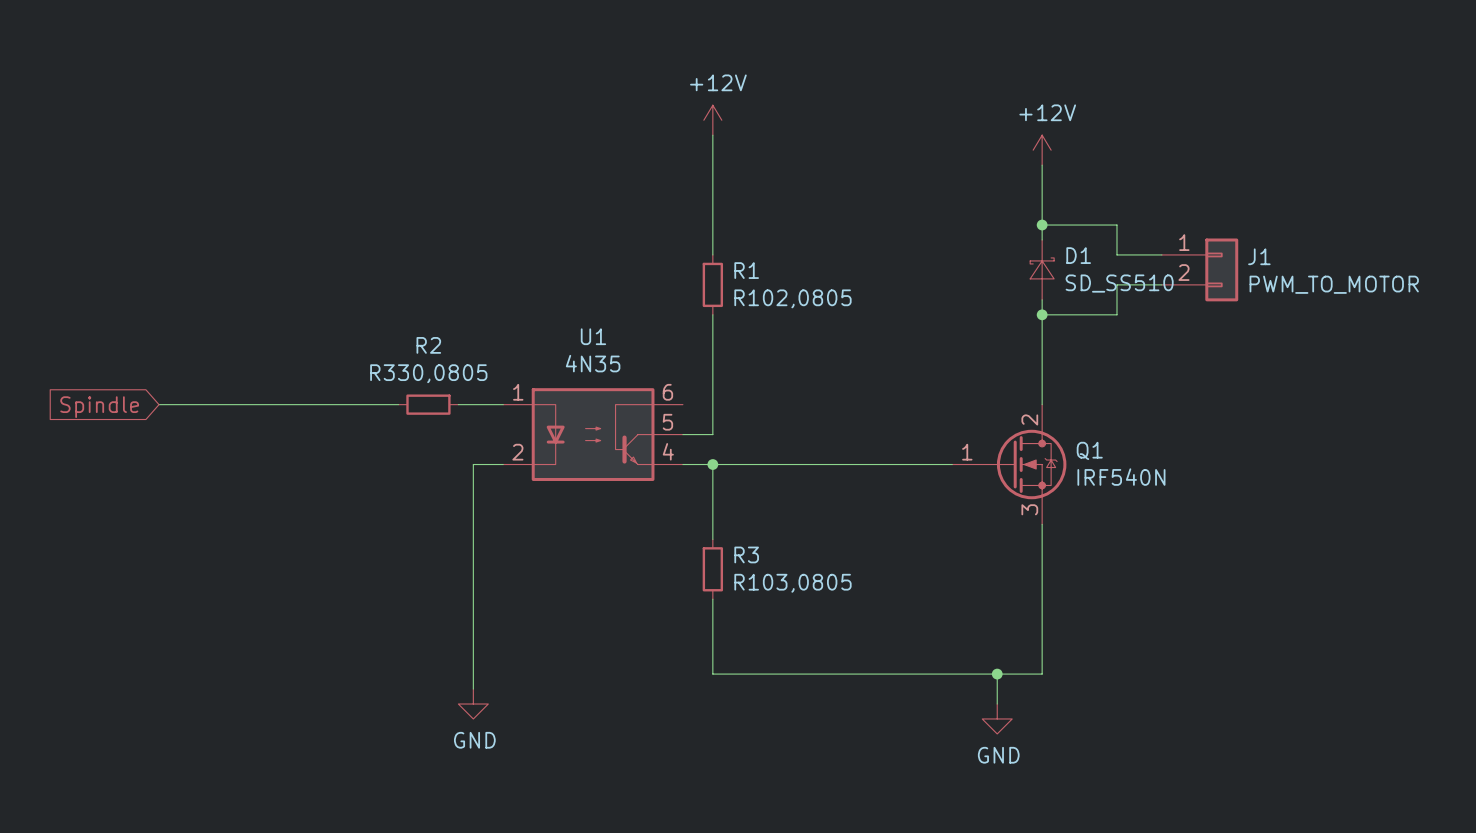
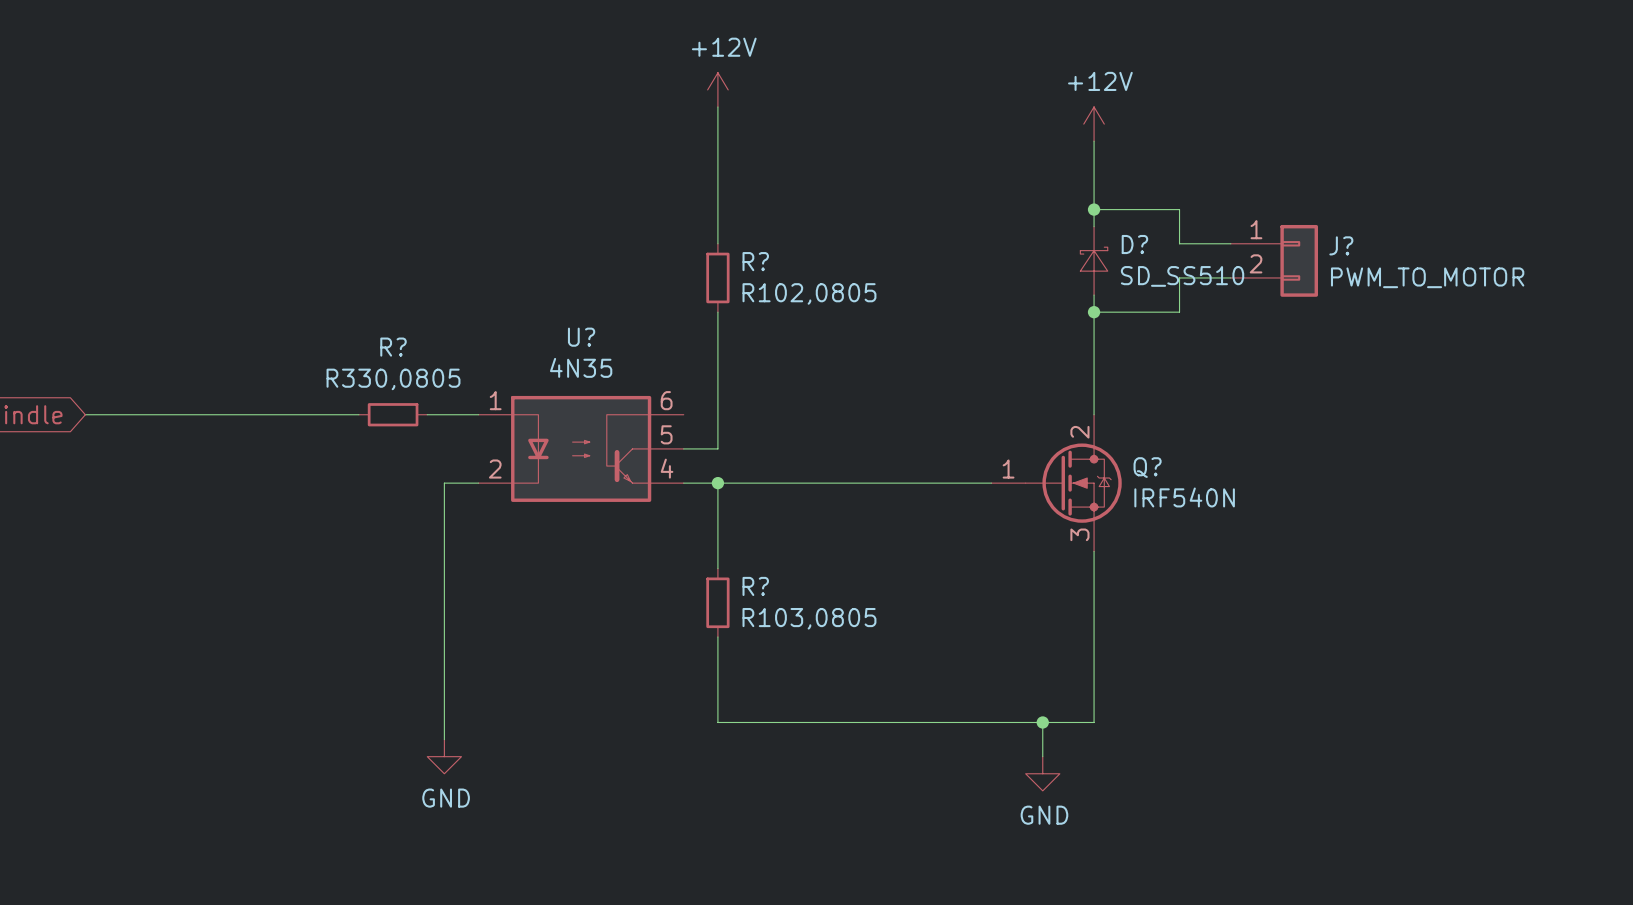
D1 name: D1 (1078, 255) -> D? (1134, 244)
J1 name: J1 (1259, 256) -> J? (1341, 245)
R1 name: R1 (746, 270) -> R? (755, 261)
U1 name: U1 (593, 336) -> U? (581, 337)
R2 name: R2 (428, 345) -> R? (393, 347)
Q1 name: Q1 (1089, 450) -> Q? (1147, 467)
R3 name: R3 (746, 554) -> R? (755, 586)

